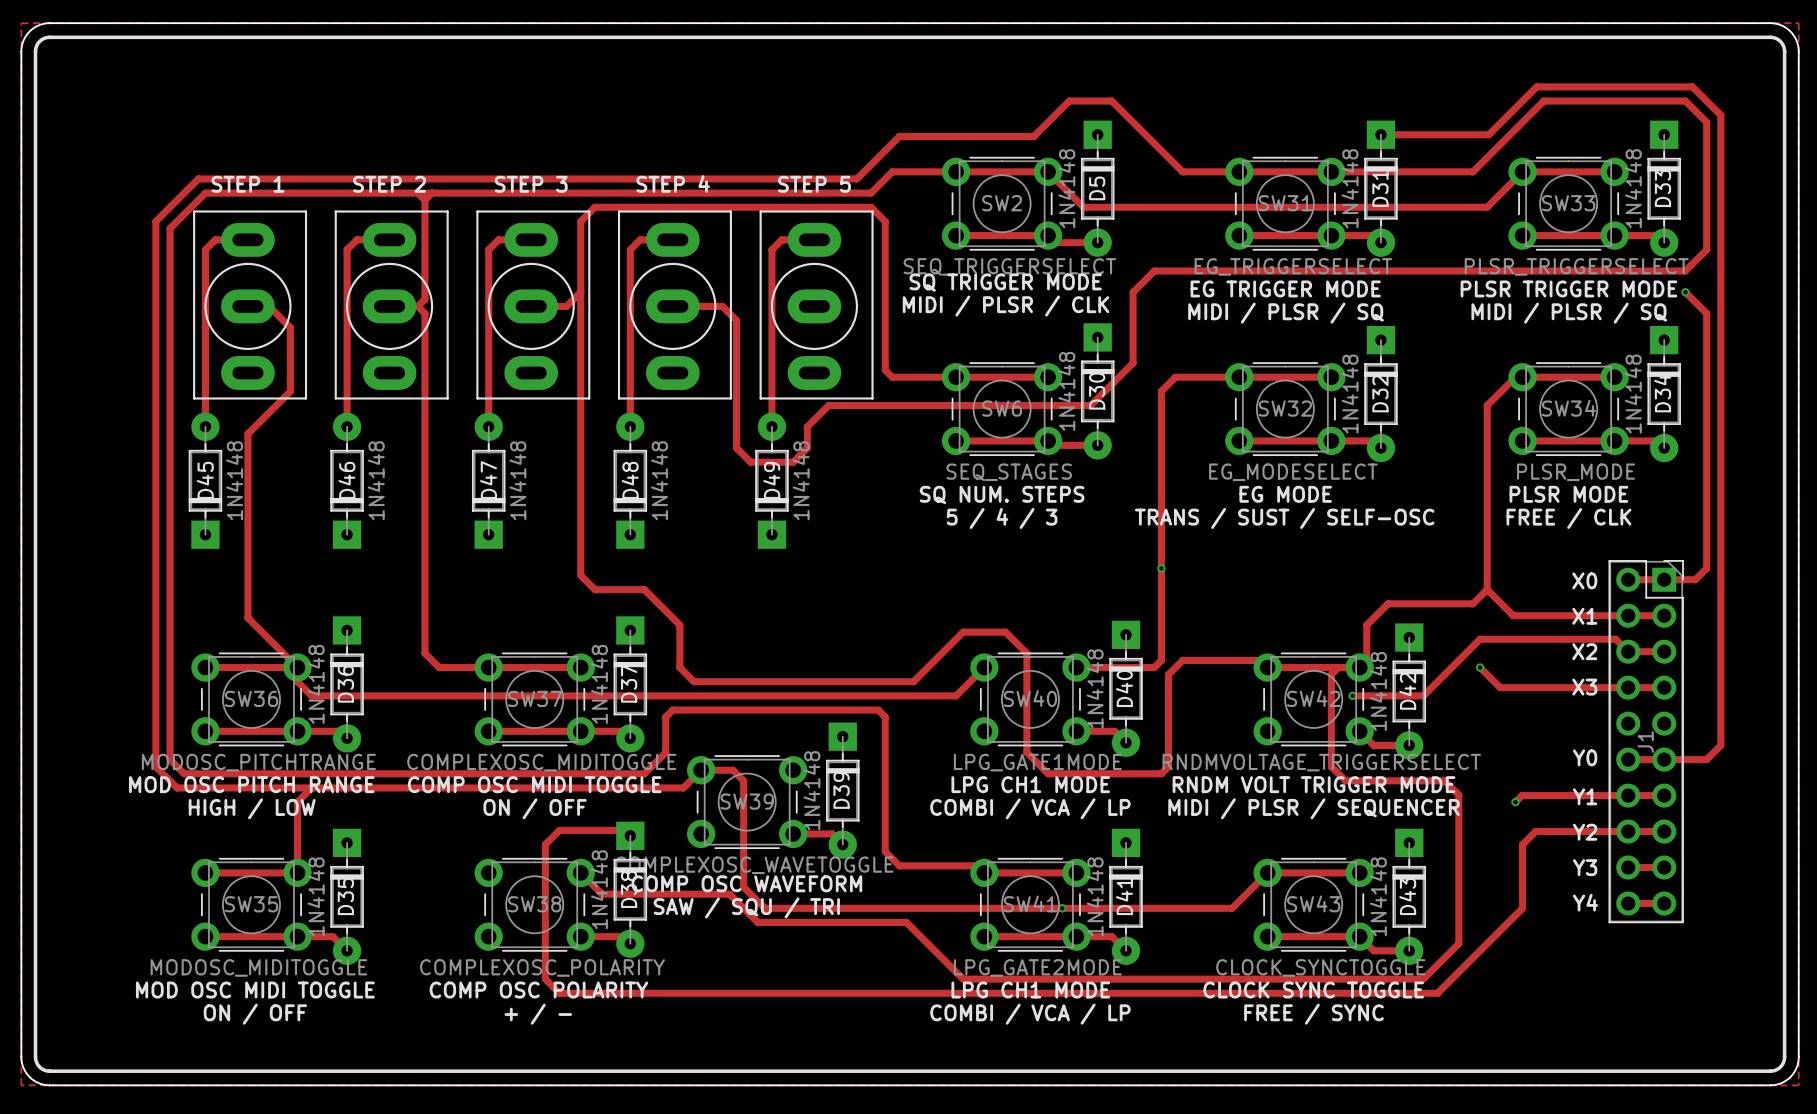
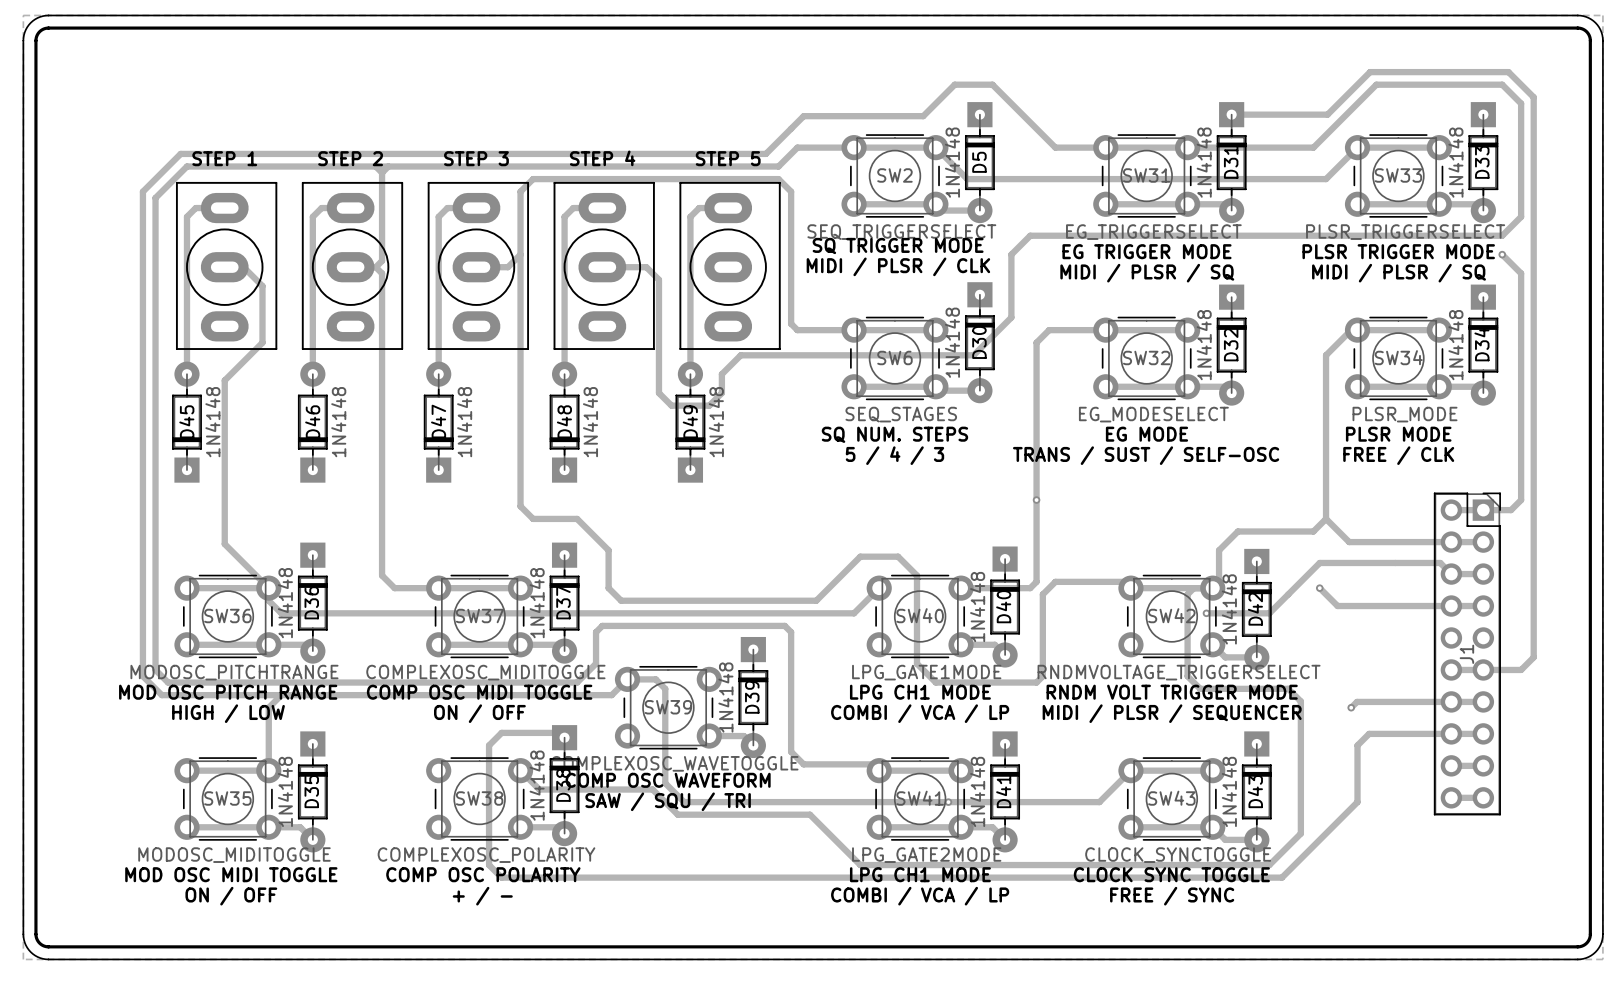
text: X0 (1584, 580) -> none
text: X1 (1584, 616) -> none
text: X2 (1584, 651) -> none
text: X3 (1584, 687) -> none
text: Y0 (1585, 757) -> none
text: Y1 (1585, 796) -> none
text: Y2 (1585, 832) -> none
text: Y3 (1585, 867) -> none
text: Y4 (1585, 902) -> none

